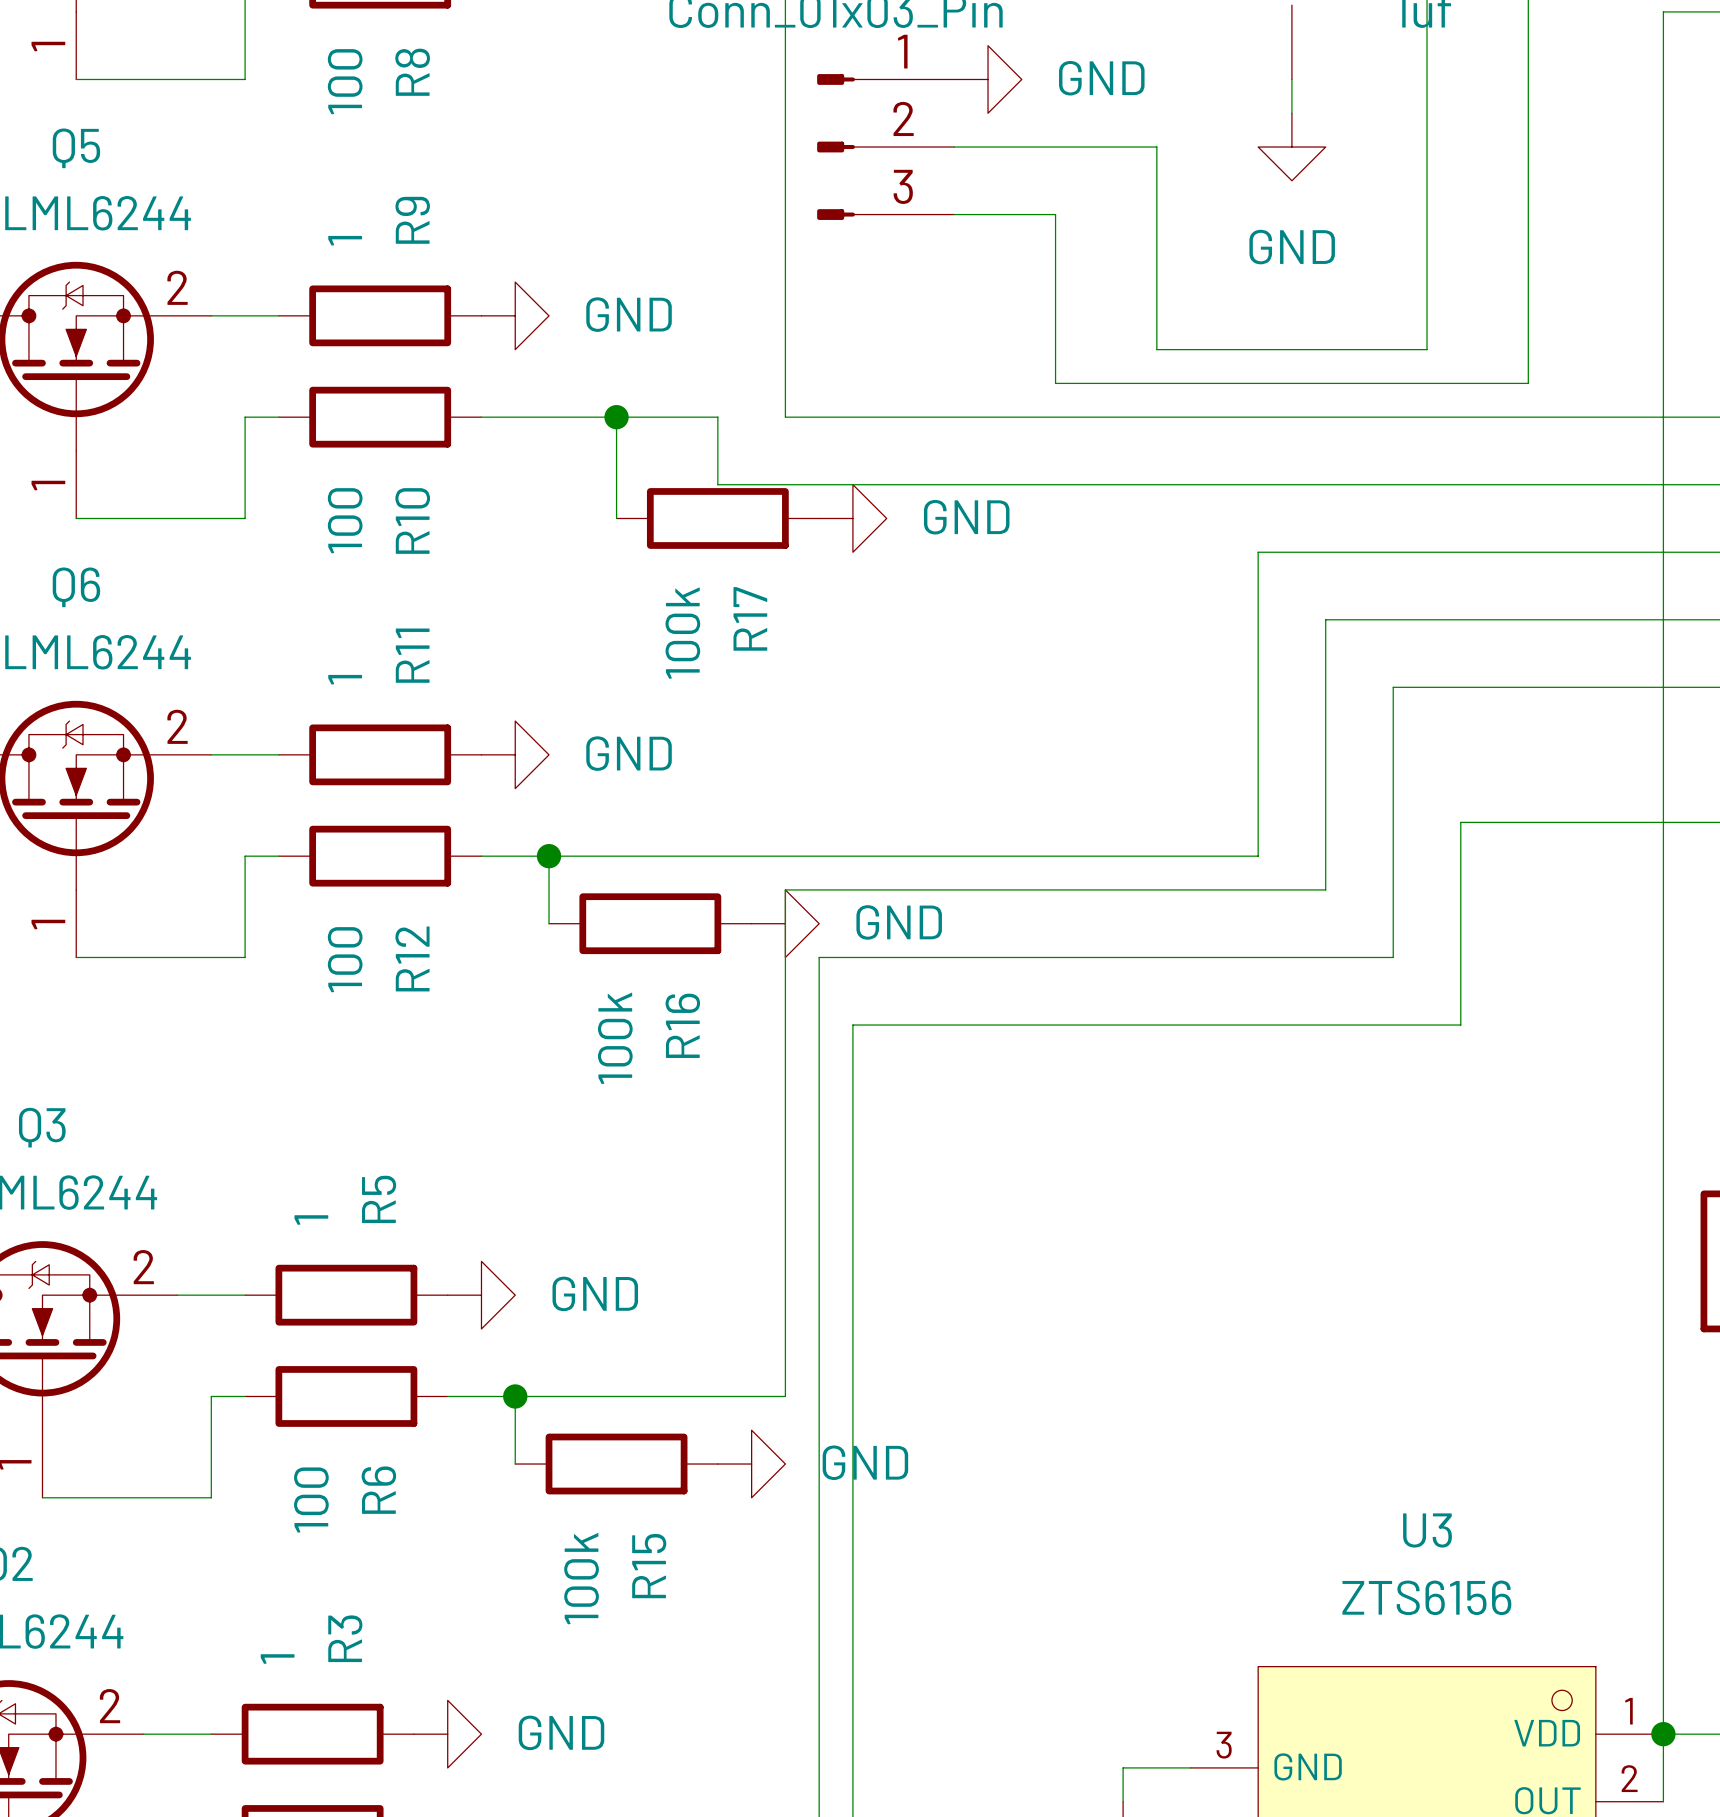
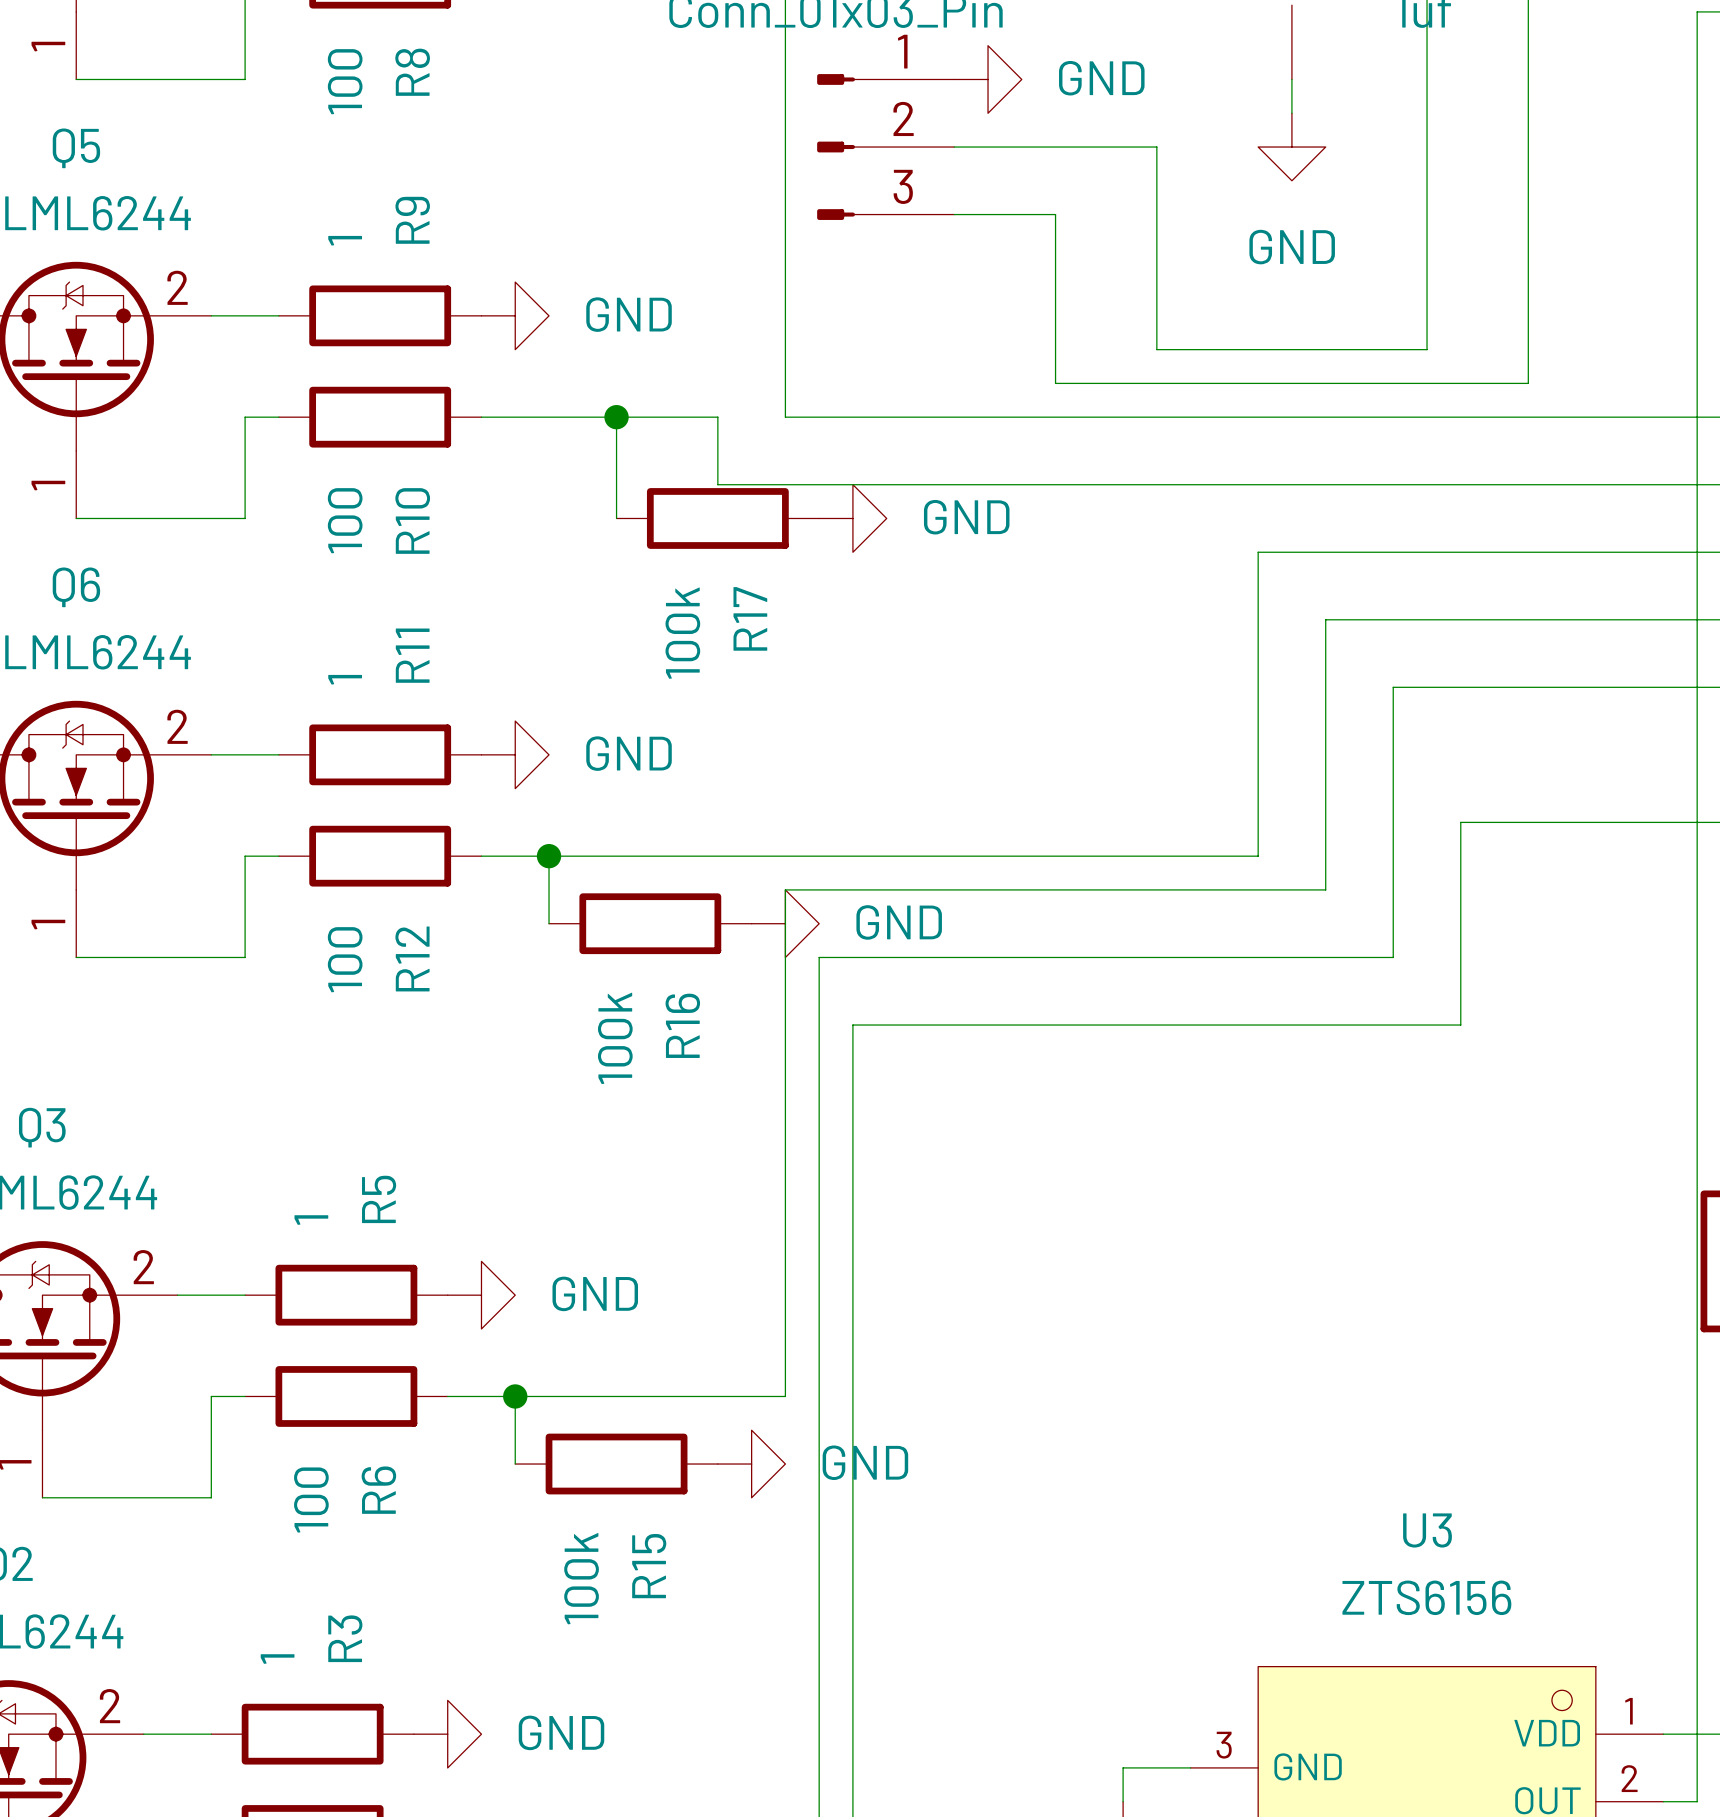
wire: (1697, 11) (1663, 11) (1663, 1801) -> (1697, 11) (1697, 1801) (1663, 1801)
junction: (1663, 1734) -> none

